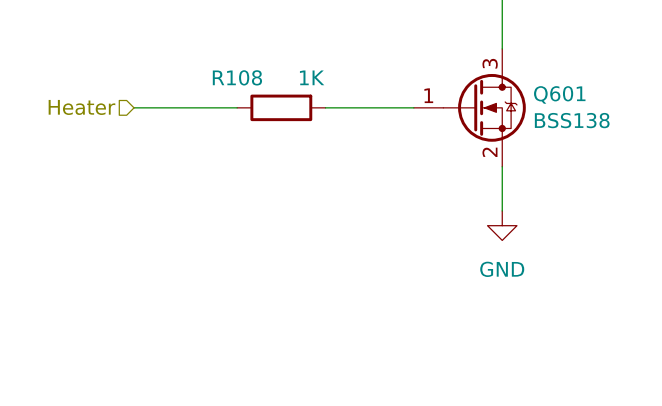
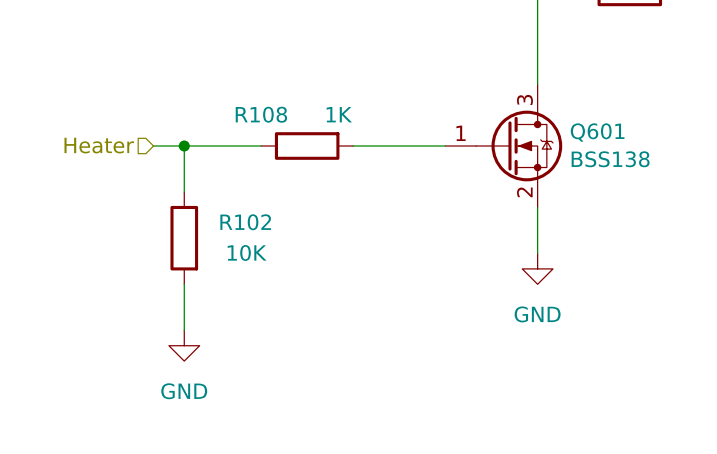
wire: none -> (184, 146) (184, 192)
junction: none -> (184, 146)
R102: none -> 10K (184, 238)
wire: none -> (184, 284) (184, 330)
power symbol: none -> GND (184, 345)

